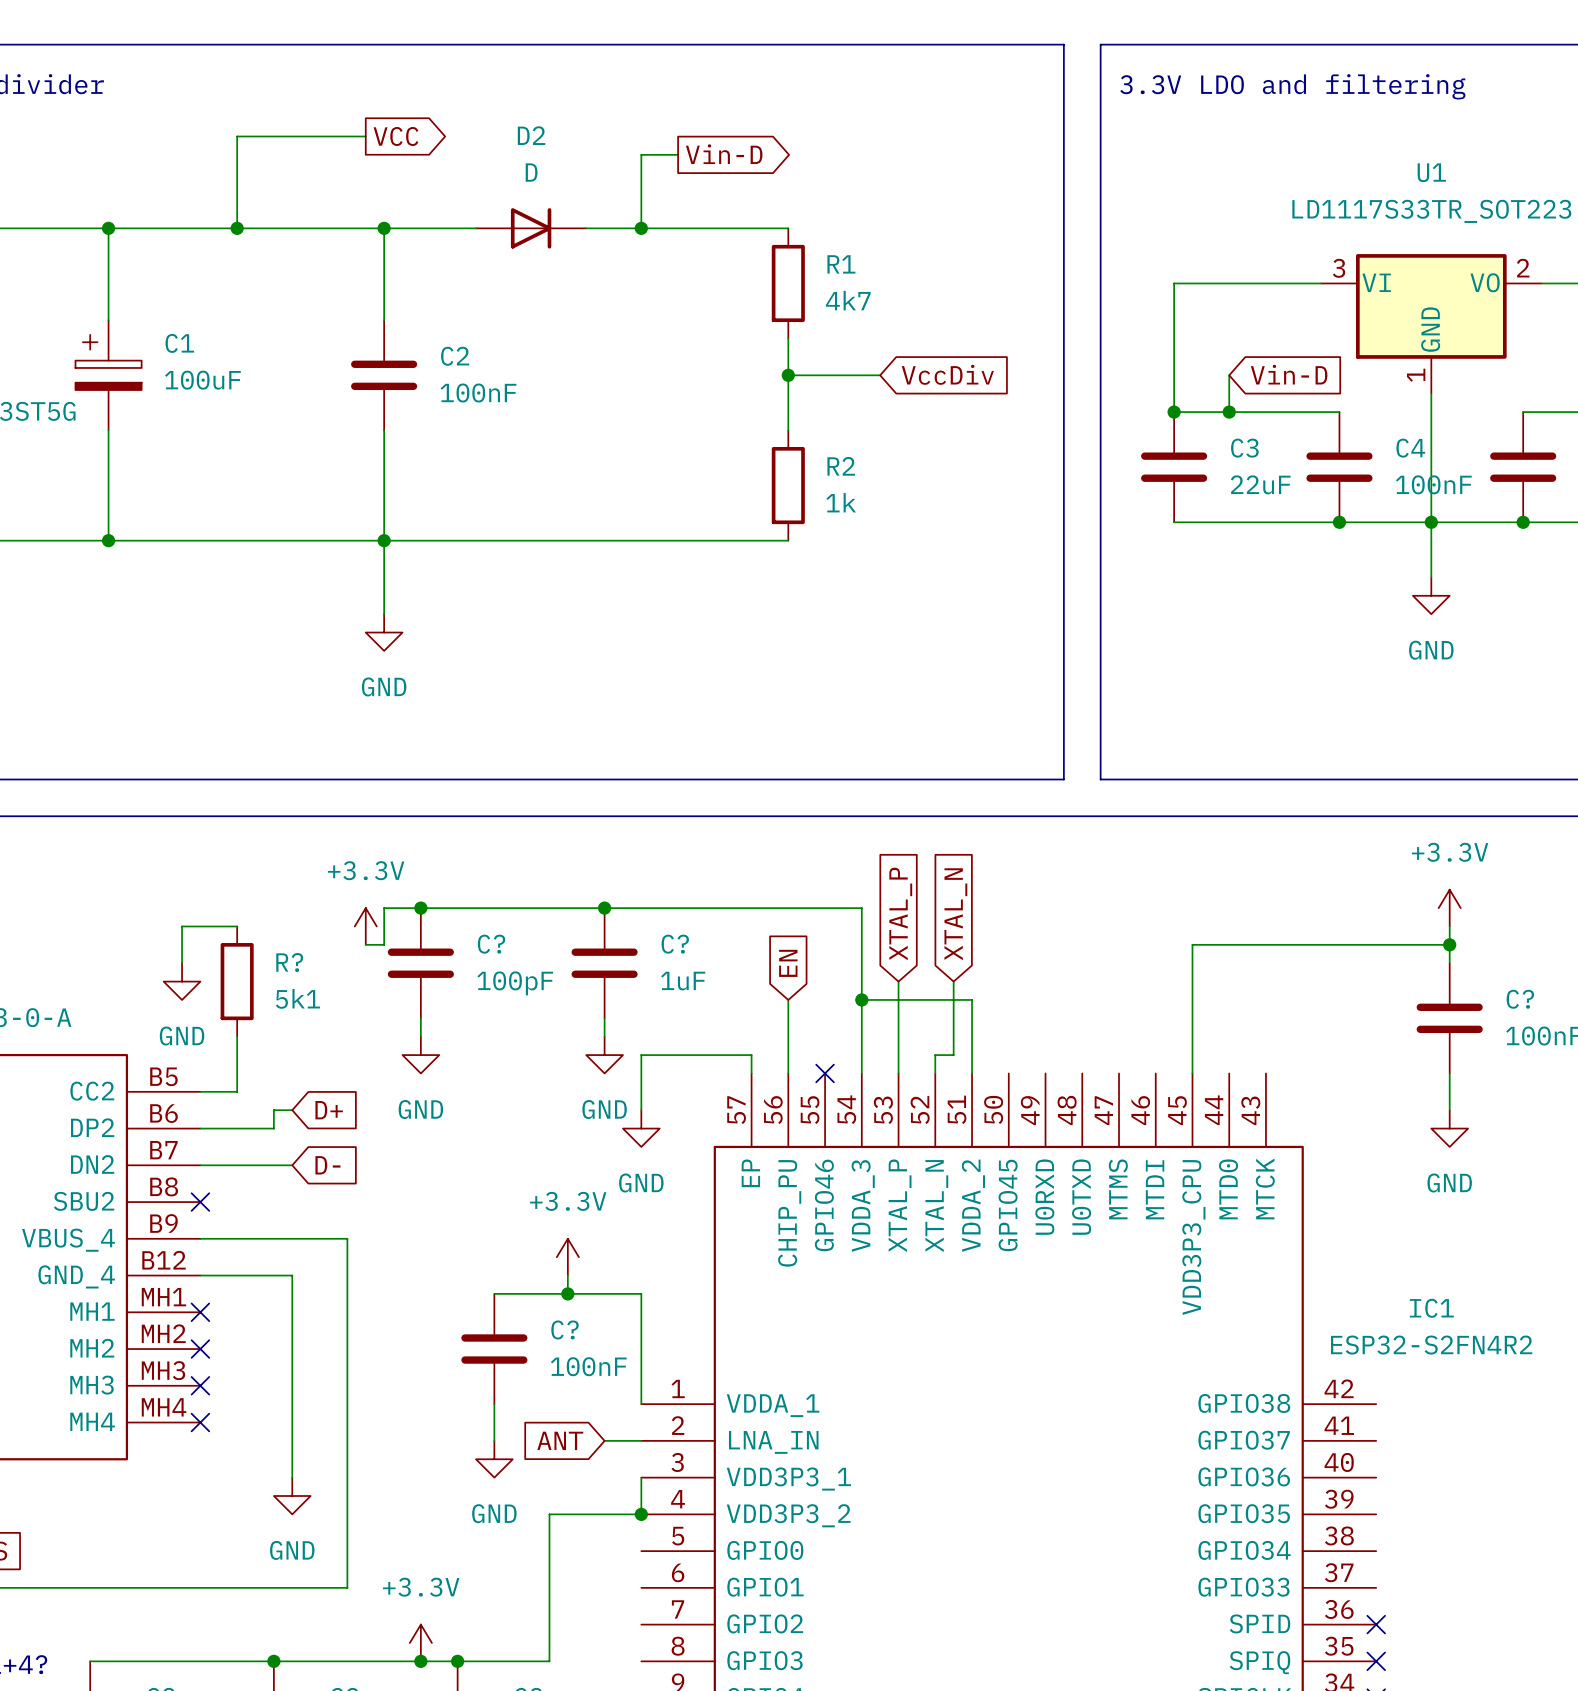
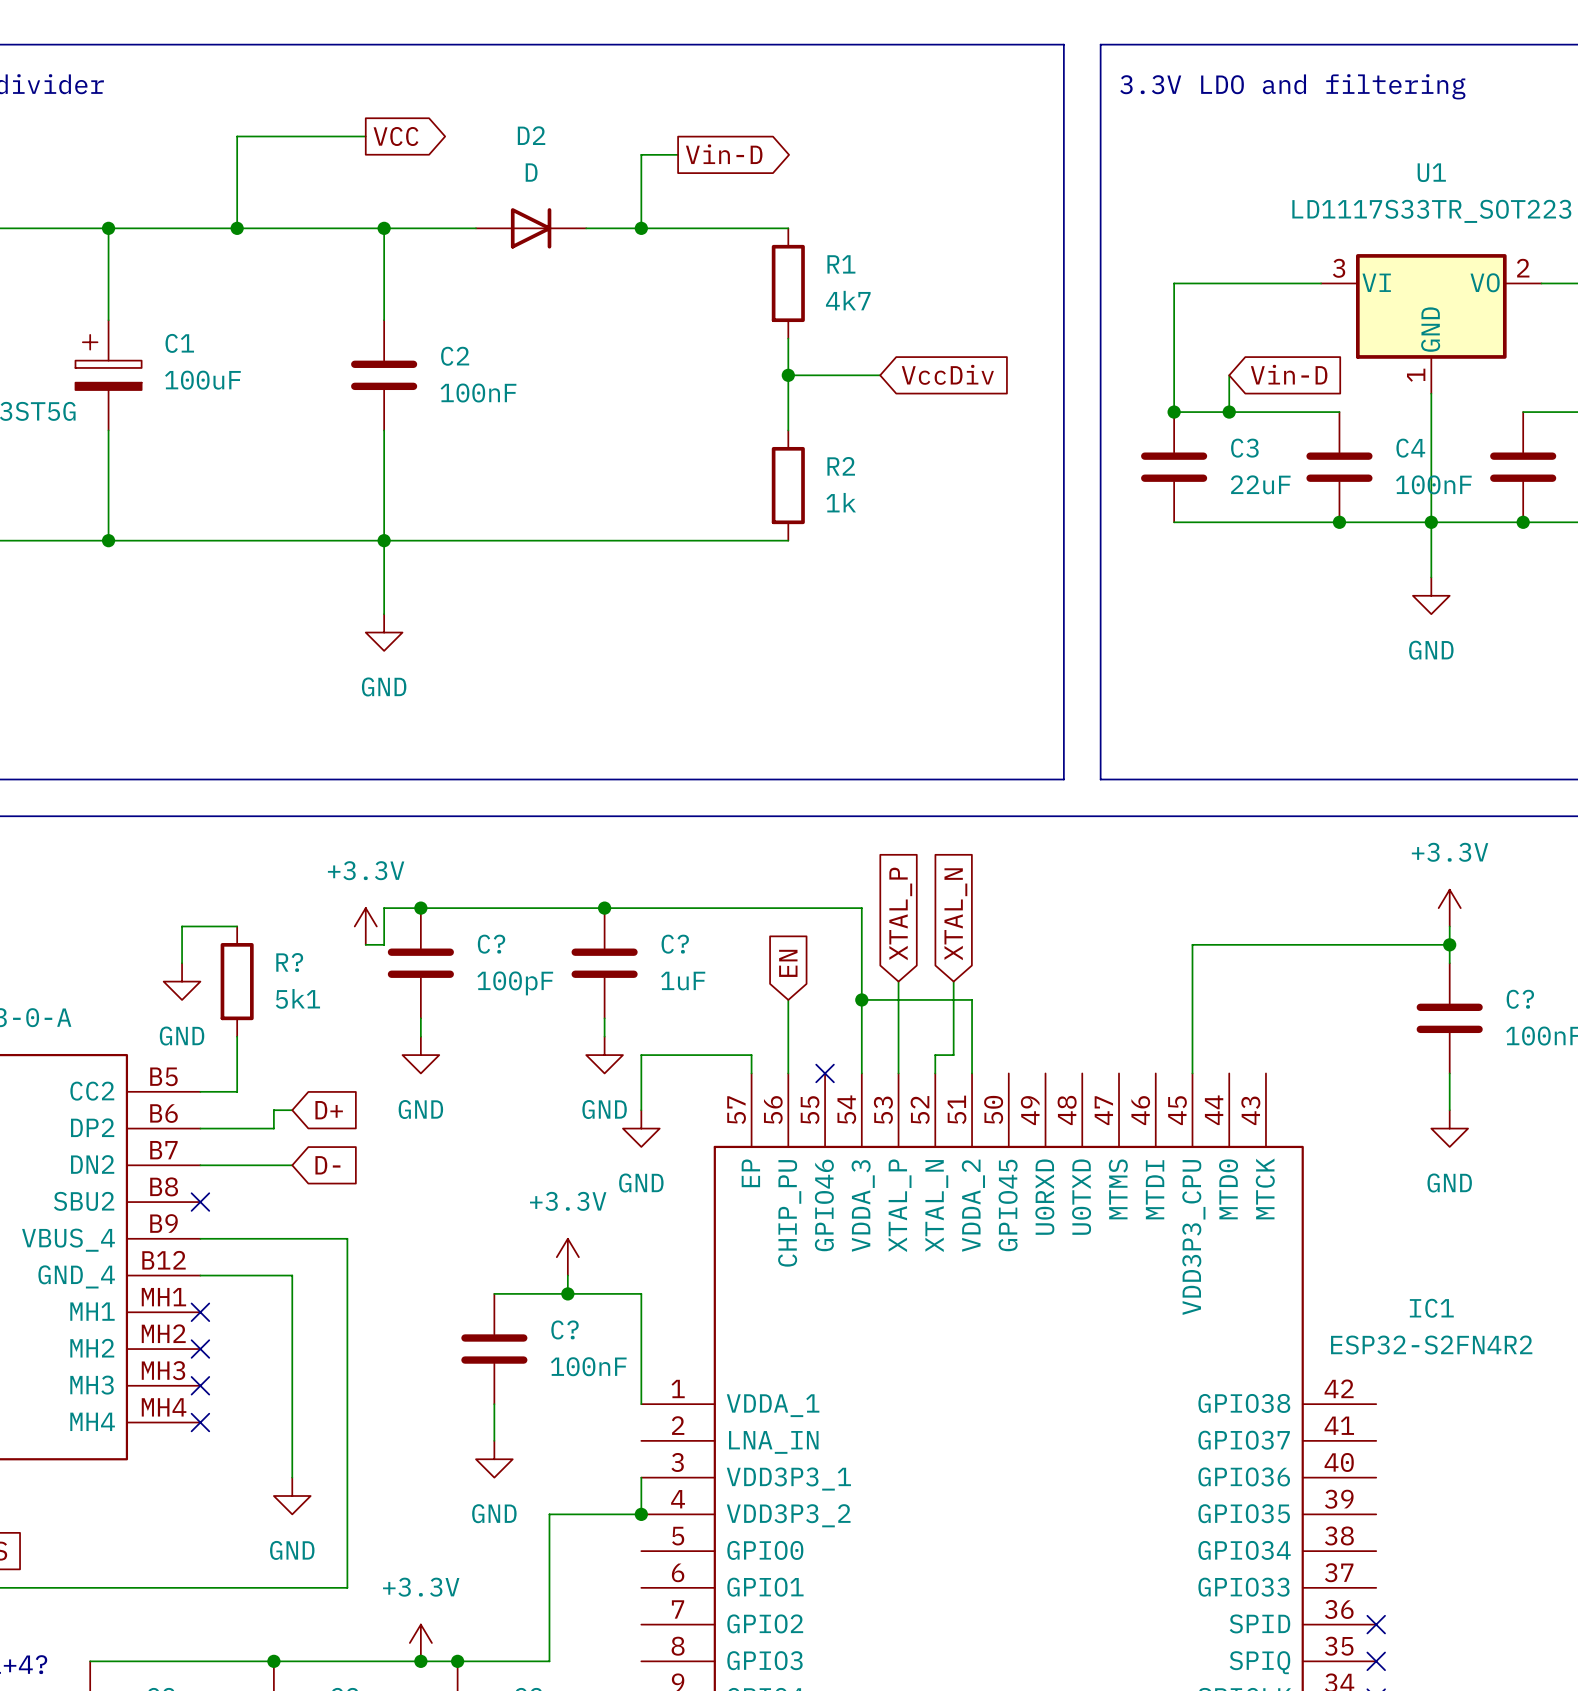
global label: ANT (560, 1440) -> none
wire: (604, 1440) (641, 1440) -> none

